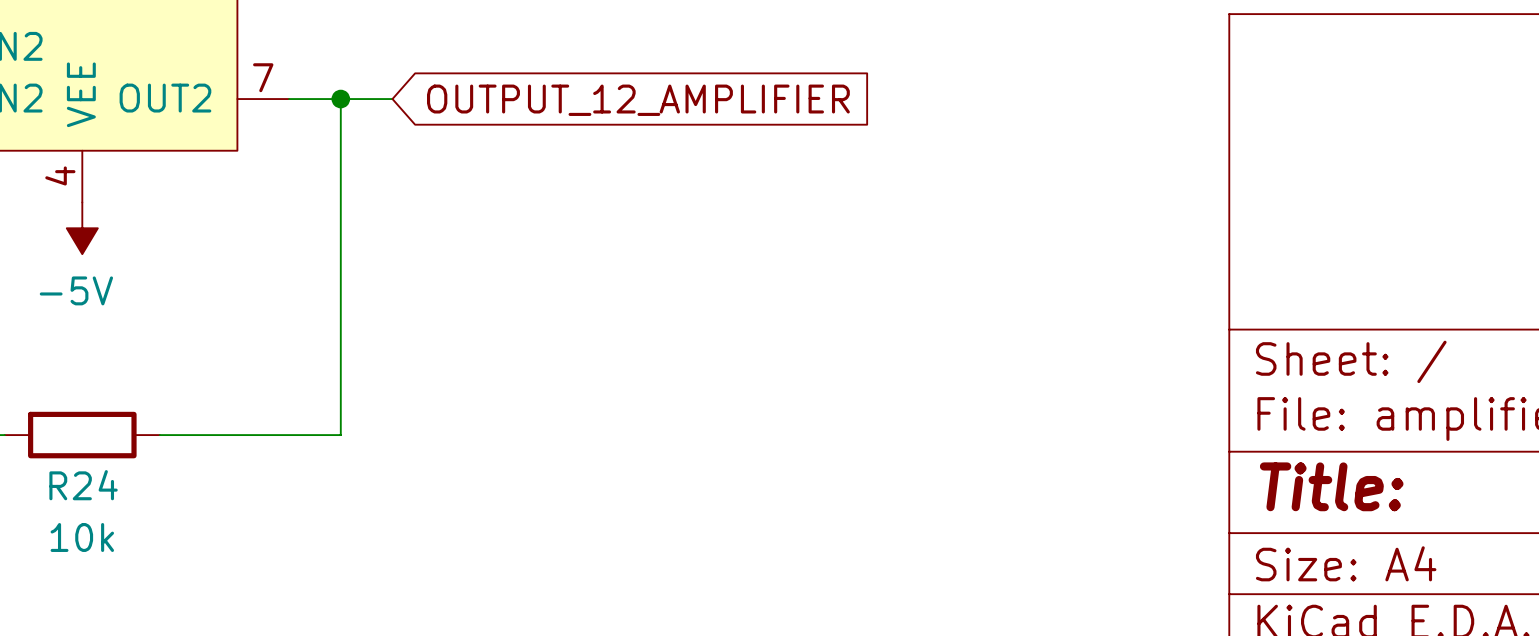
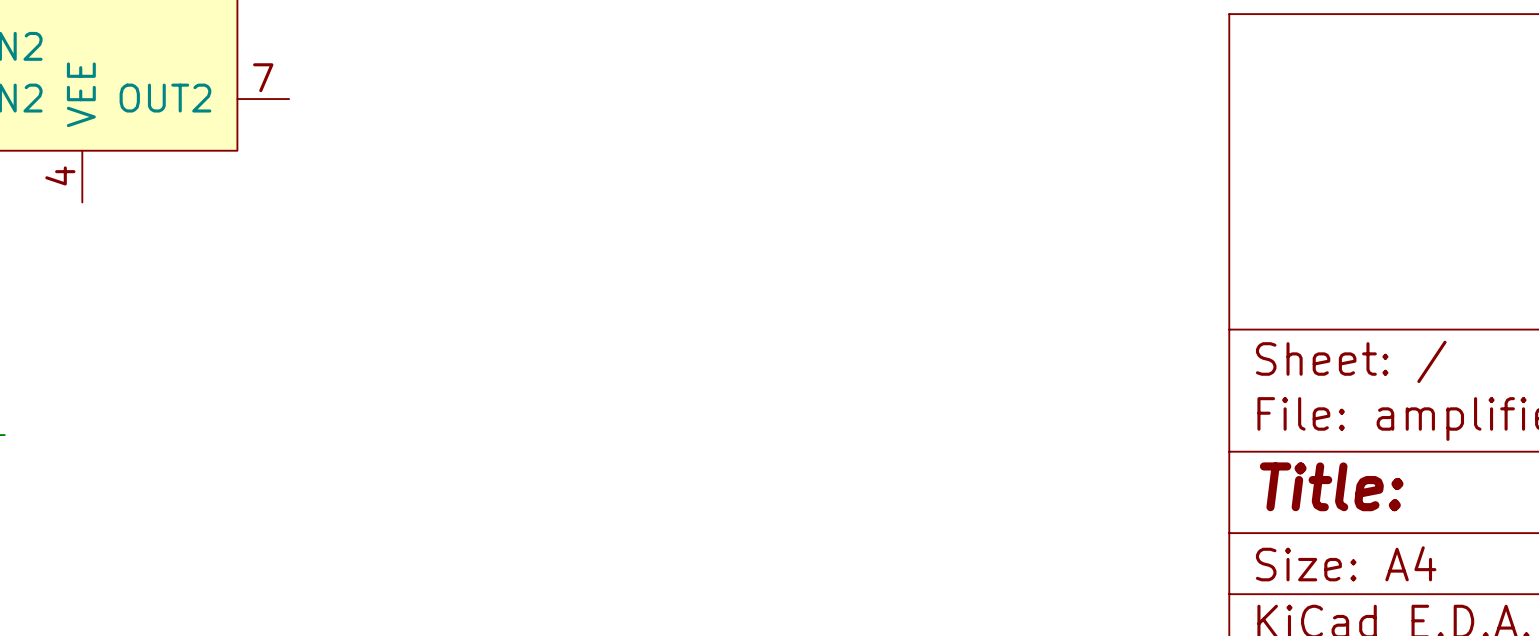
wire: (289, 99) (392, 99) -> none
wire: (340, 99) (340, 435) (159, 435) -> none
junction: (340, 99) -> none
global label: OUTPUT_12_AMPLIFIER (638, 100) -> none
power symbol: -5V (82, 228) -> none
R24: 10k (82, 435) -> none

